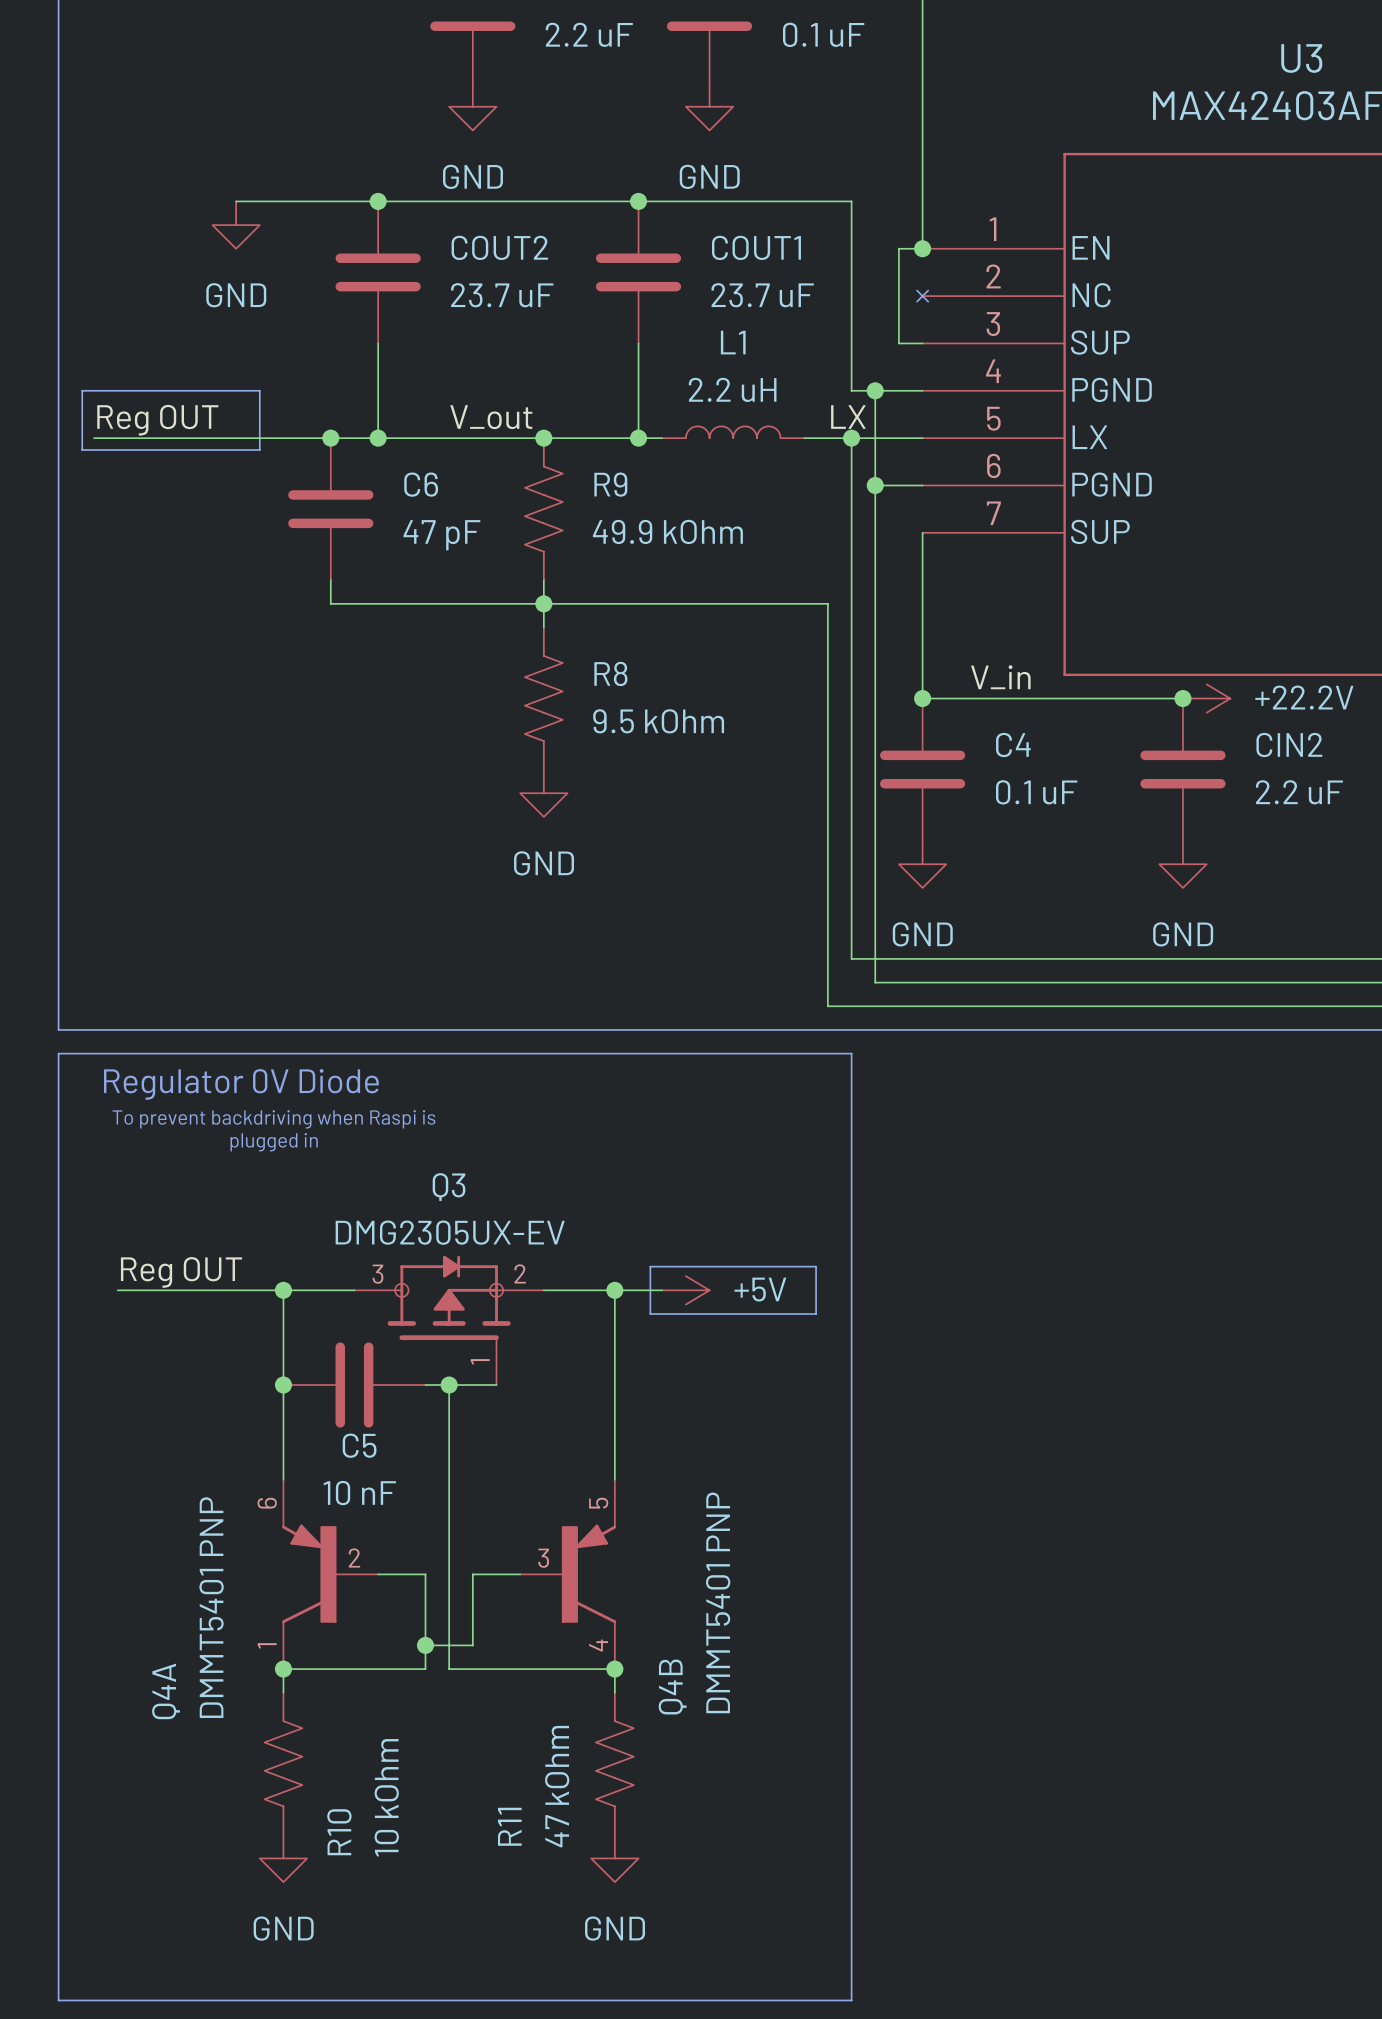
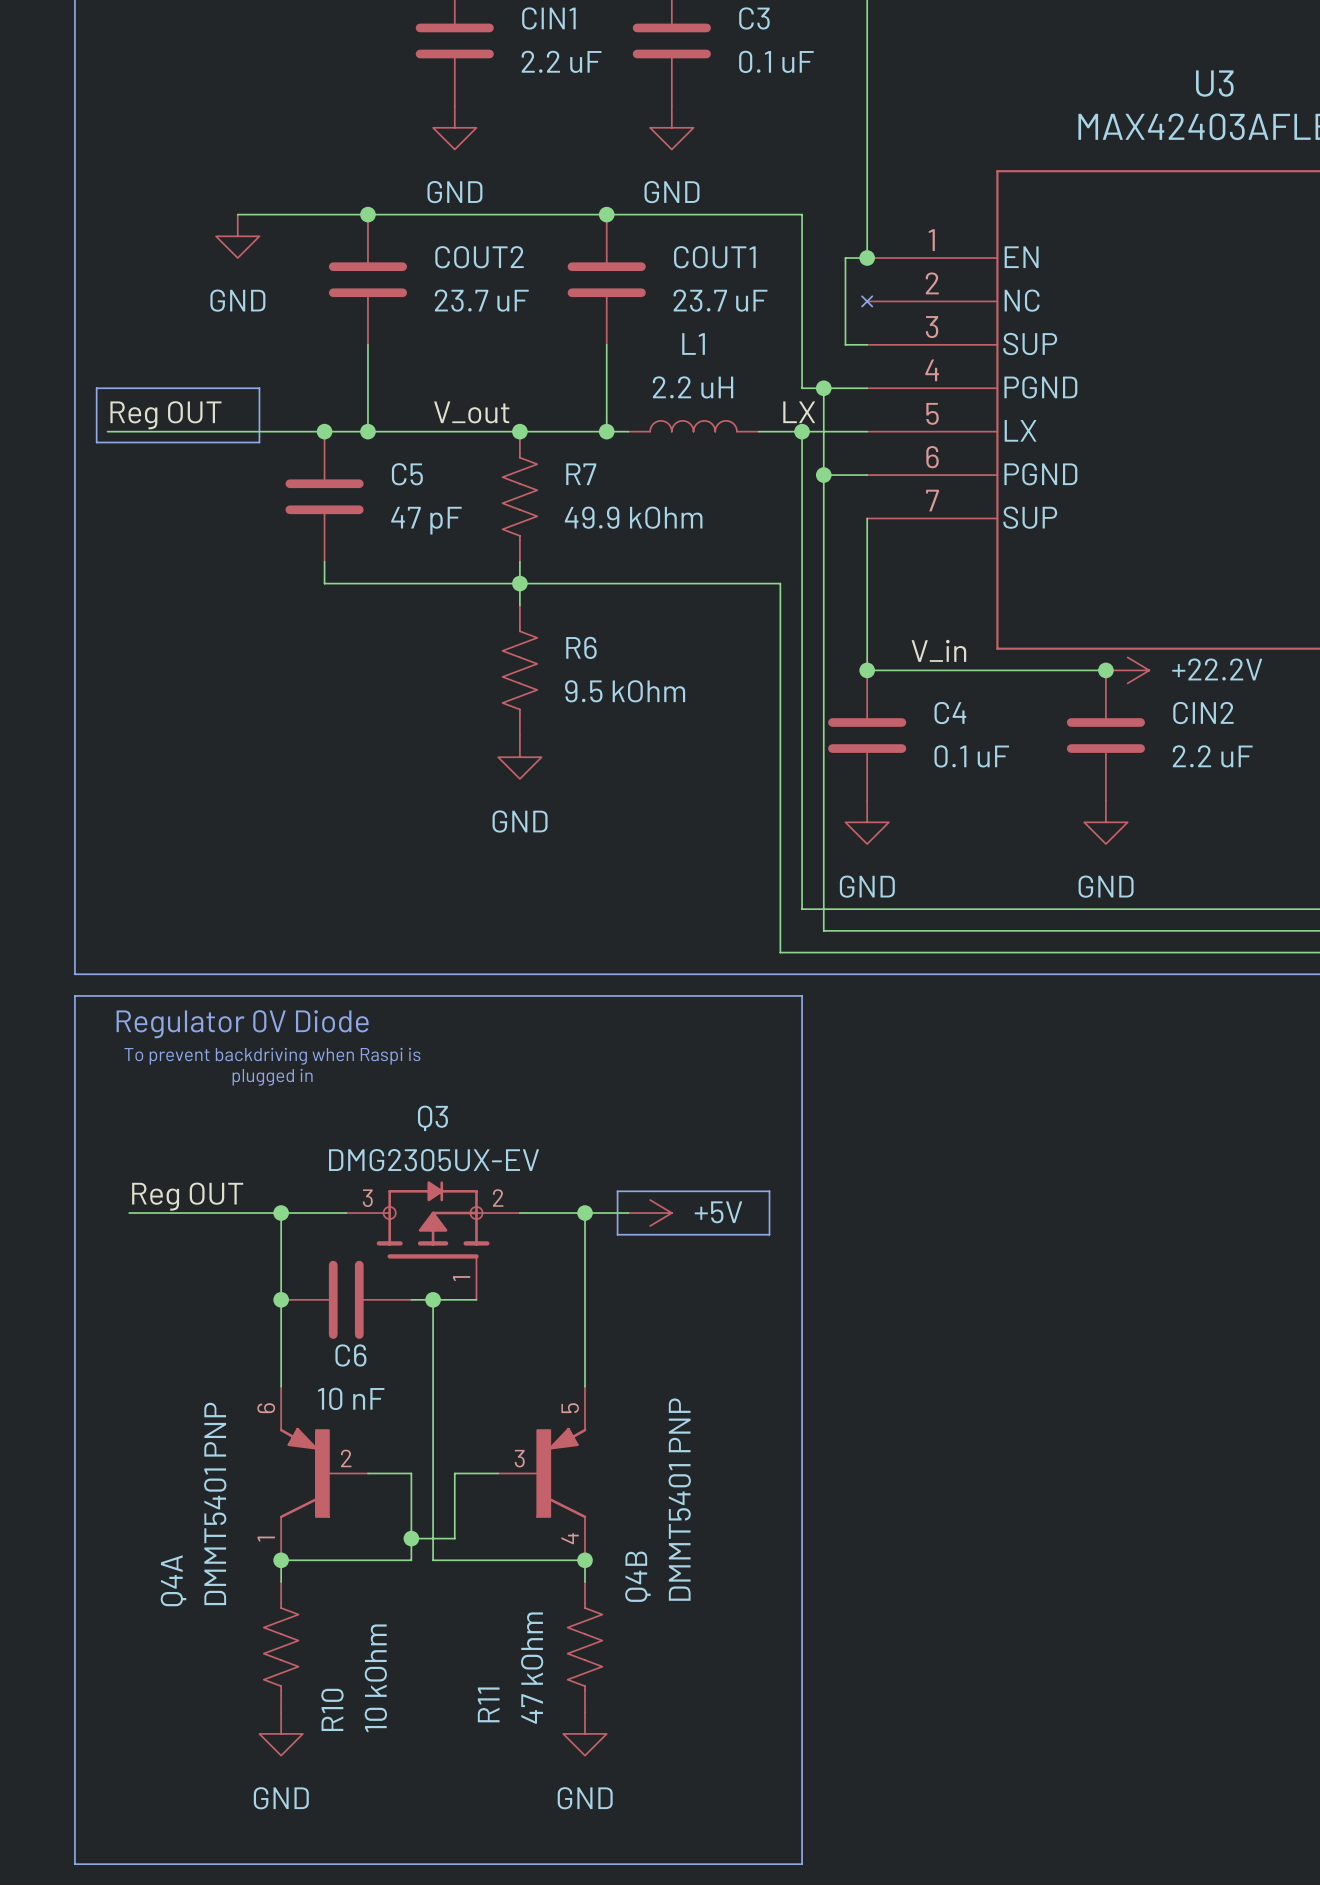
C6 name: C6 (421, 484) -> C5 (407, 474)
R9 name: R9 (610, 484) -> R7 (581, 474)
R8 name: R8 (610, 673) -> R6 (581, 647)
C5 name: C5 (359, 1445) -> C6 (350, 1355)

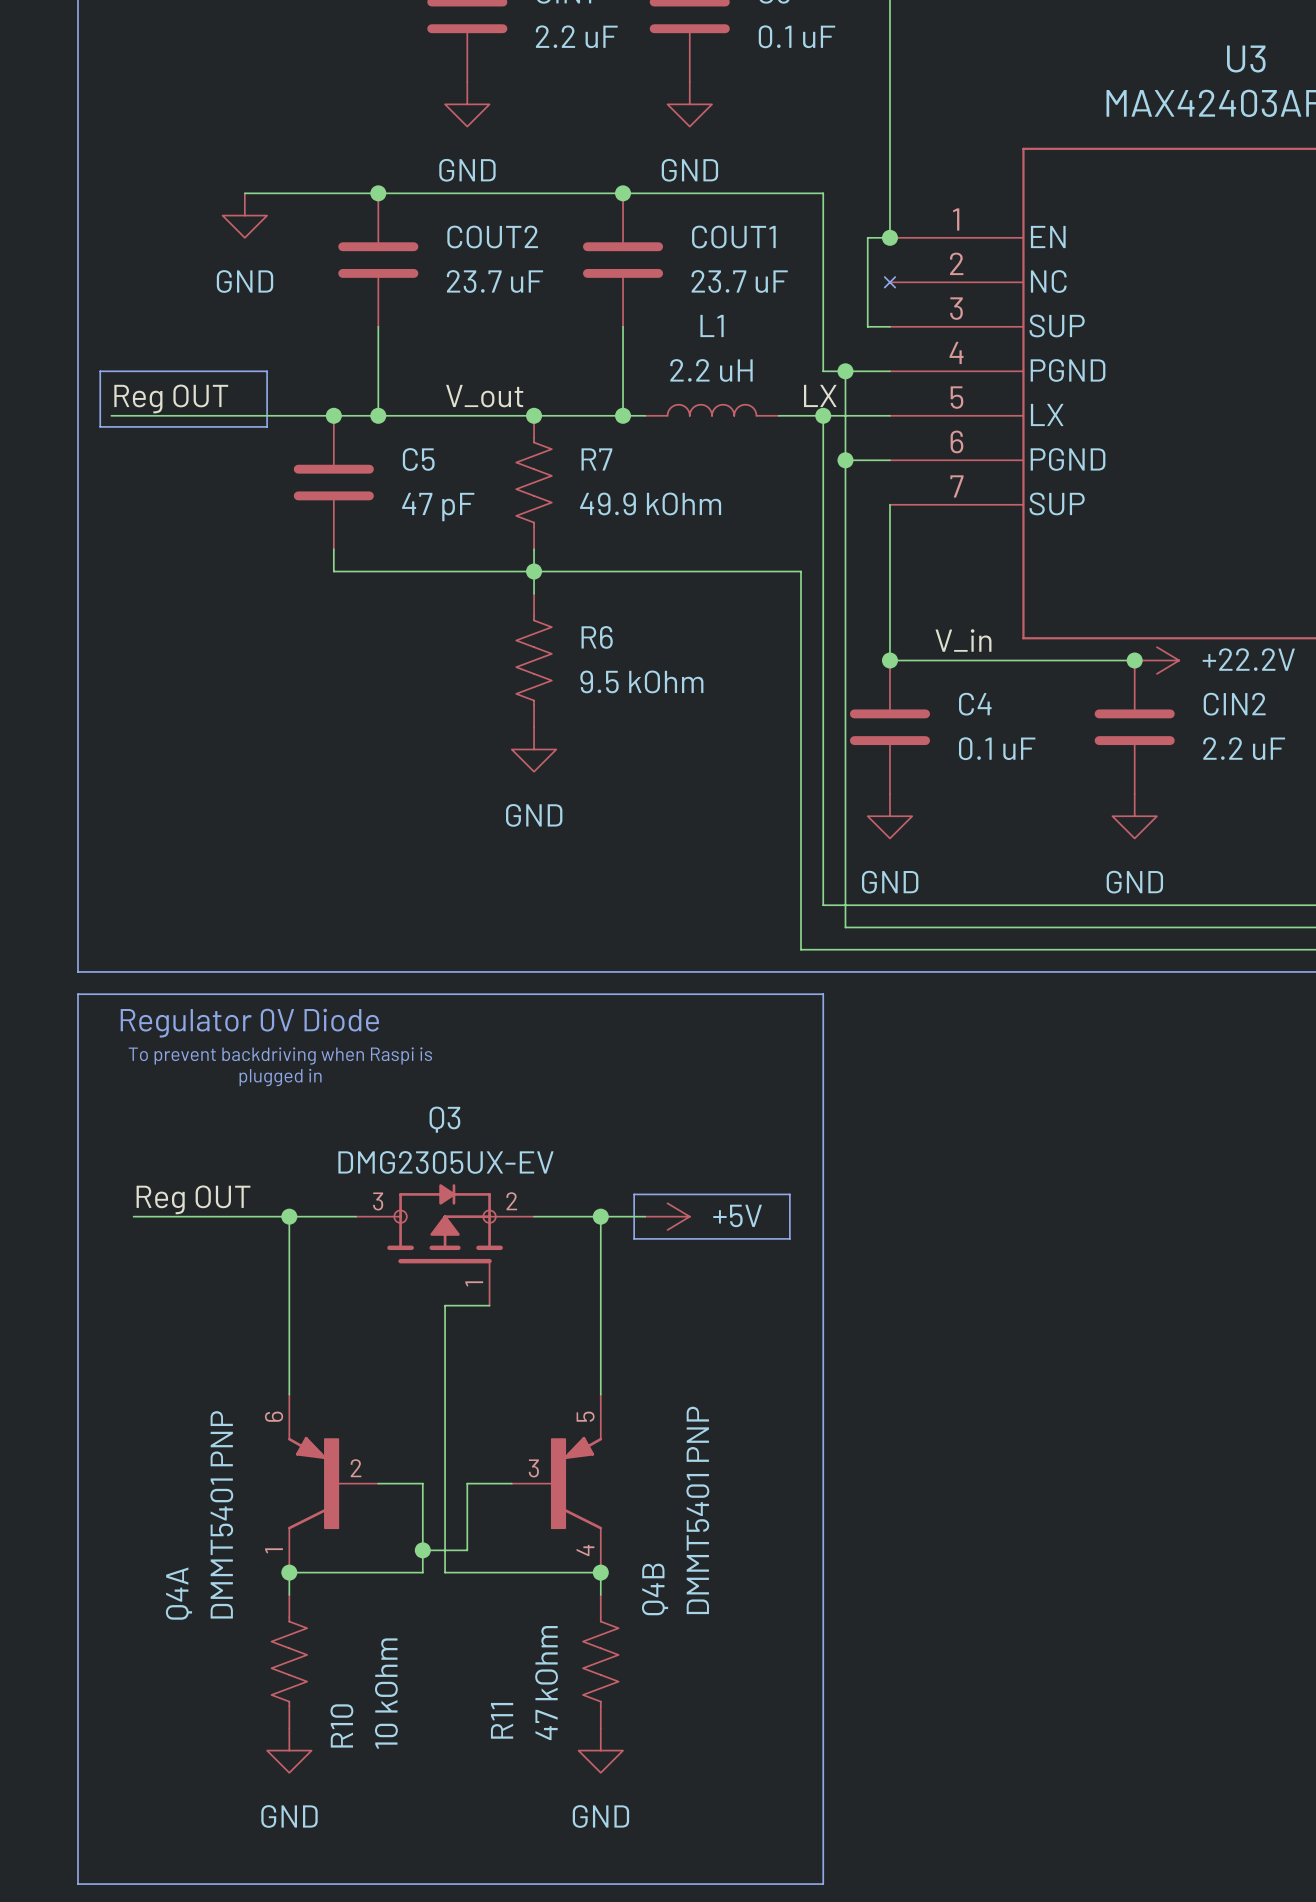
junction: (281, 1299) -> none
C6: 10 nF (346, 1299) -> none
wire: (411, 1299) (433, 1299) -> none
junction: (433, 1299) -> none

